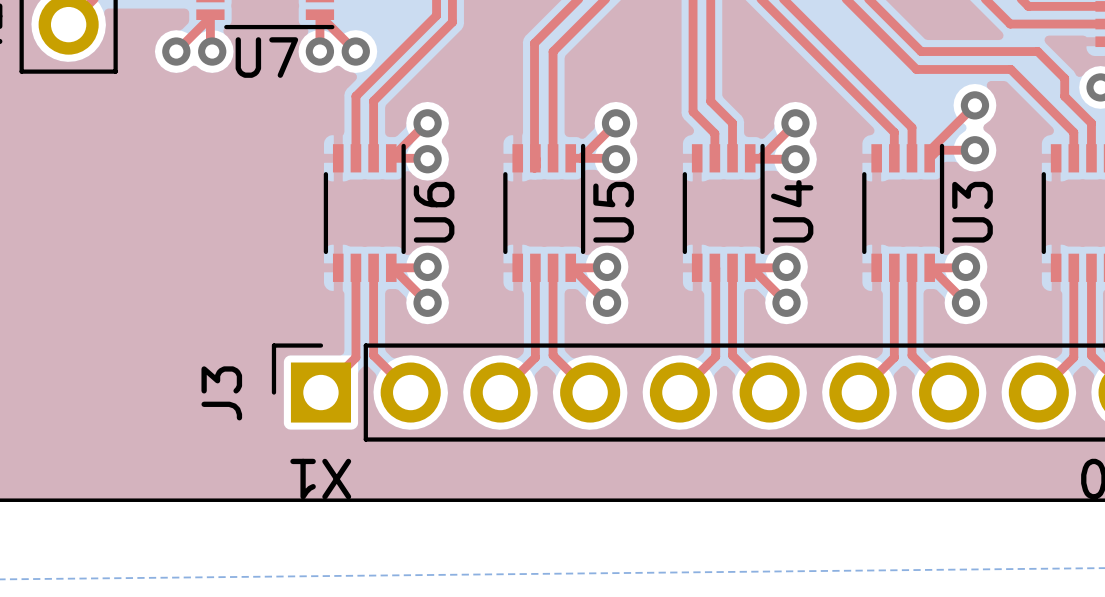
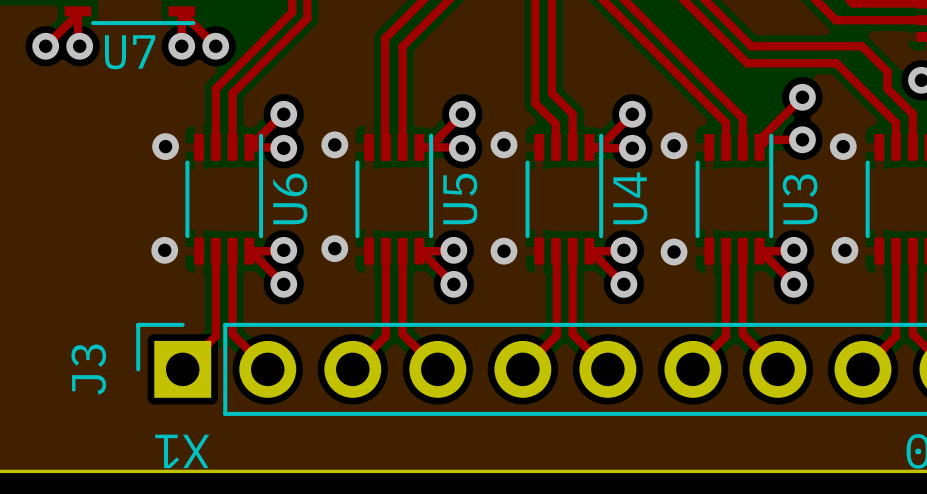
via: none -> (334, 144)
via: none -> (504, 144)
via: none -> (674, 145)
via: none -> (165, 146)
via: none -> (843, 146)
via: none -> (334, 248)
via: none -> (164, 250)
via: none -> (844, 250)
via: none -> (504, 251)
via: none -> (674, 252)

